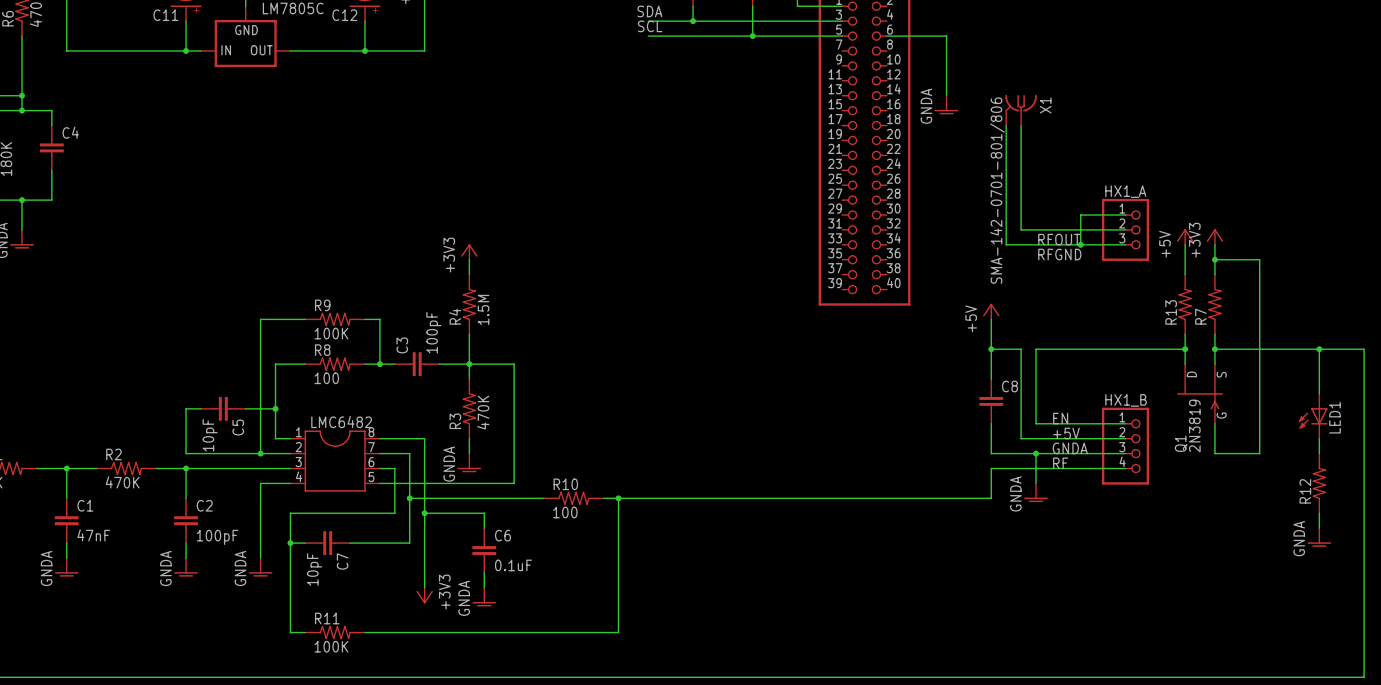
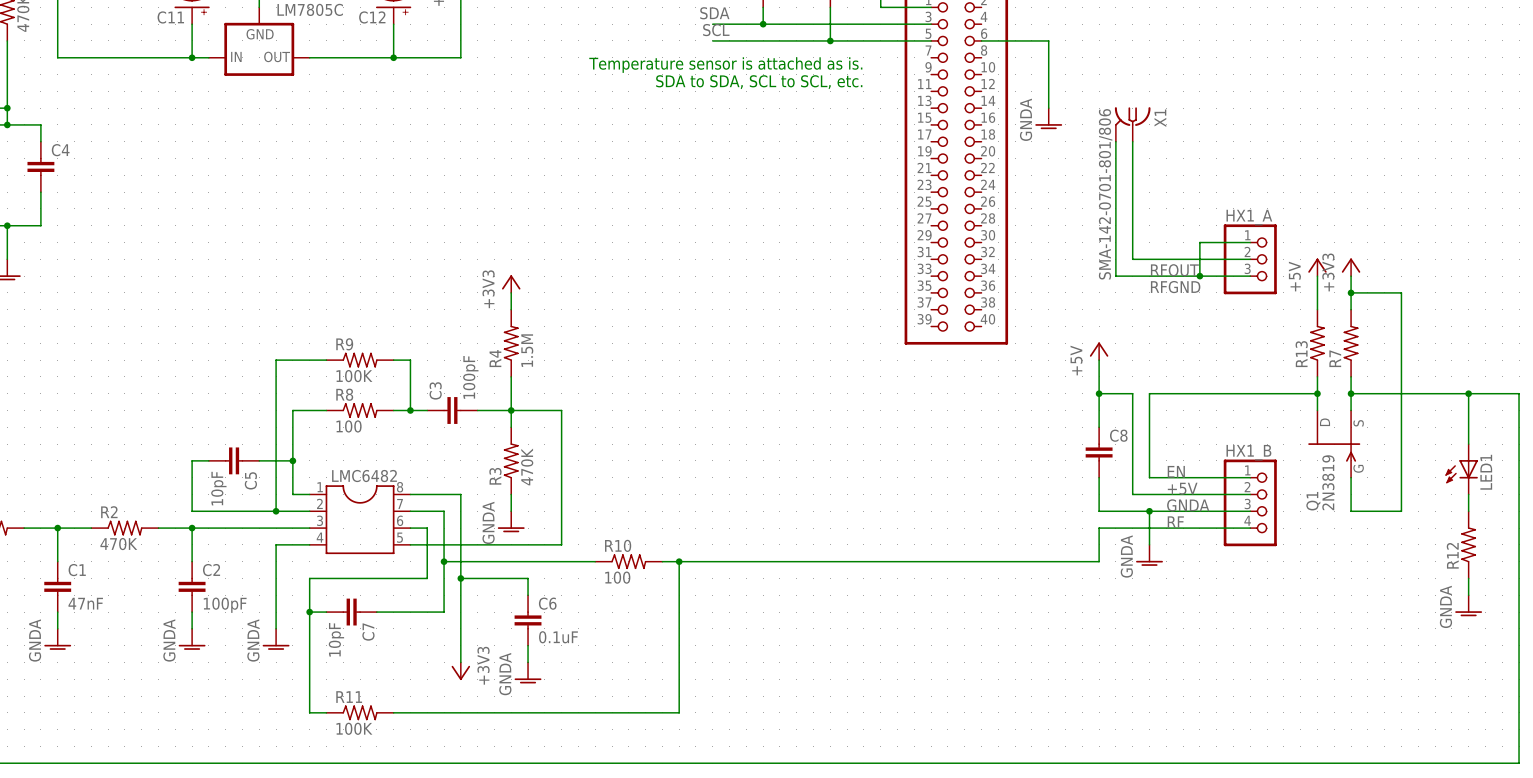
text: none -> Temperature sensor is attached as is. (725, 65)
text: none -> SDA to SDA, SCL to SCL, etc. (759, 82)

